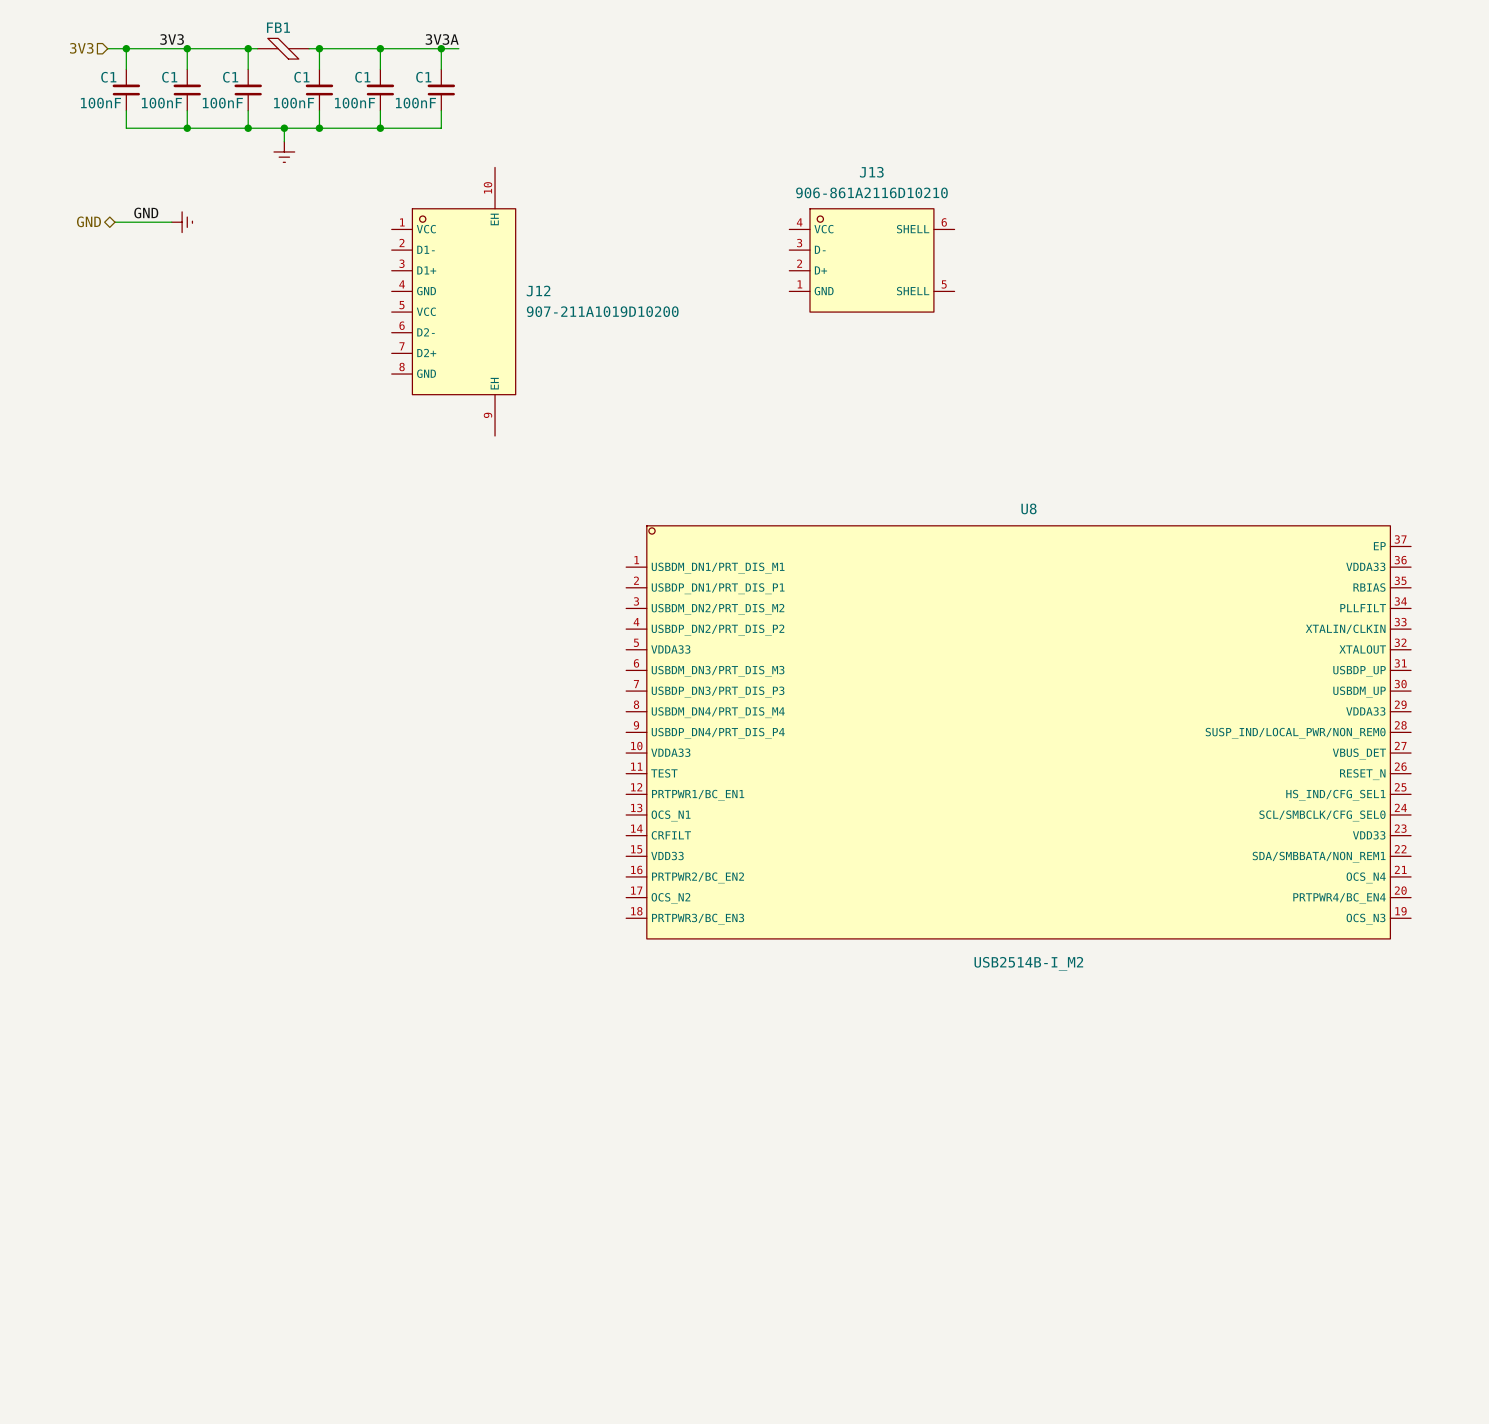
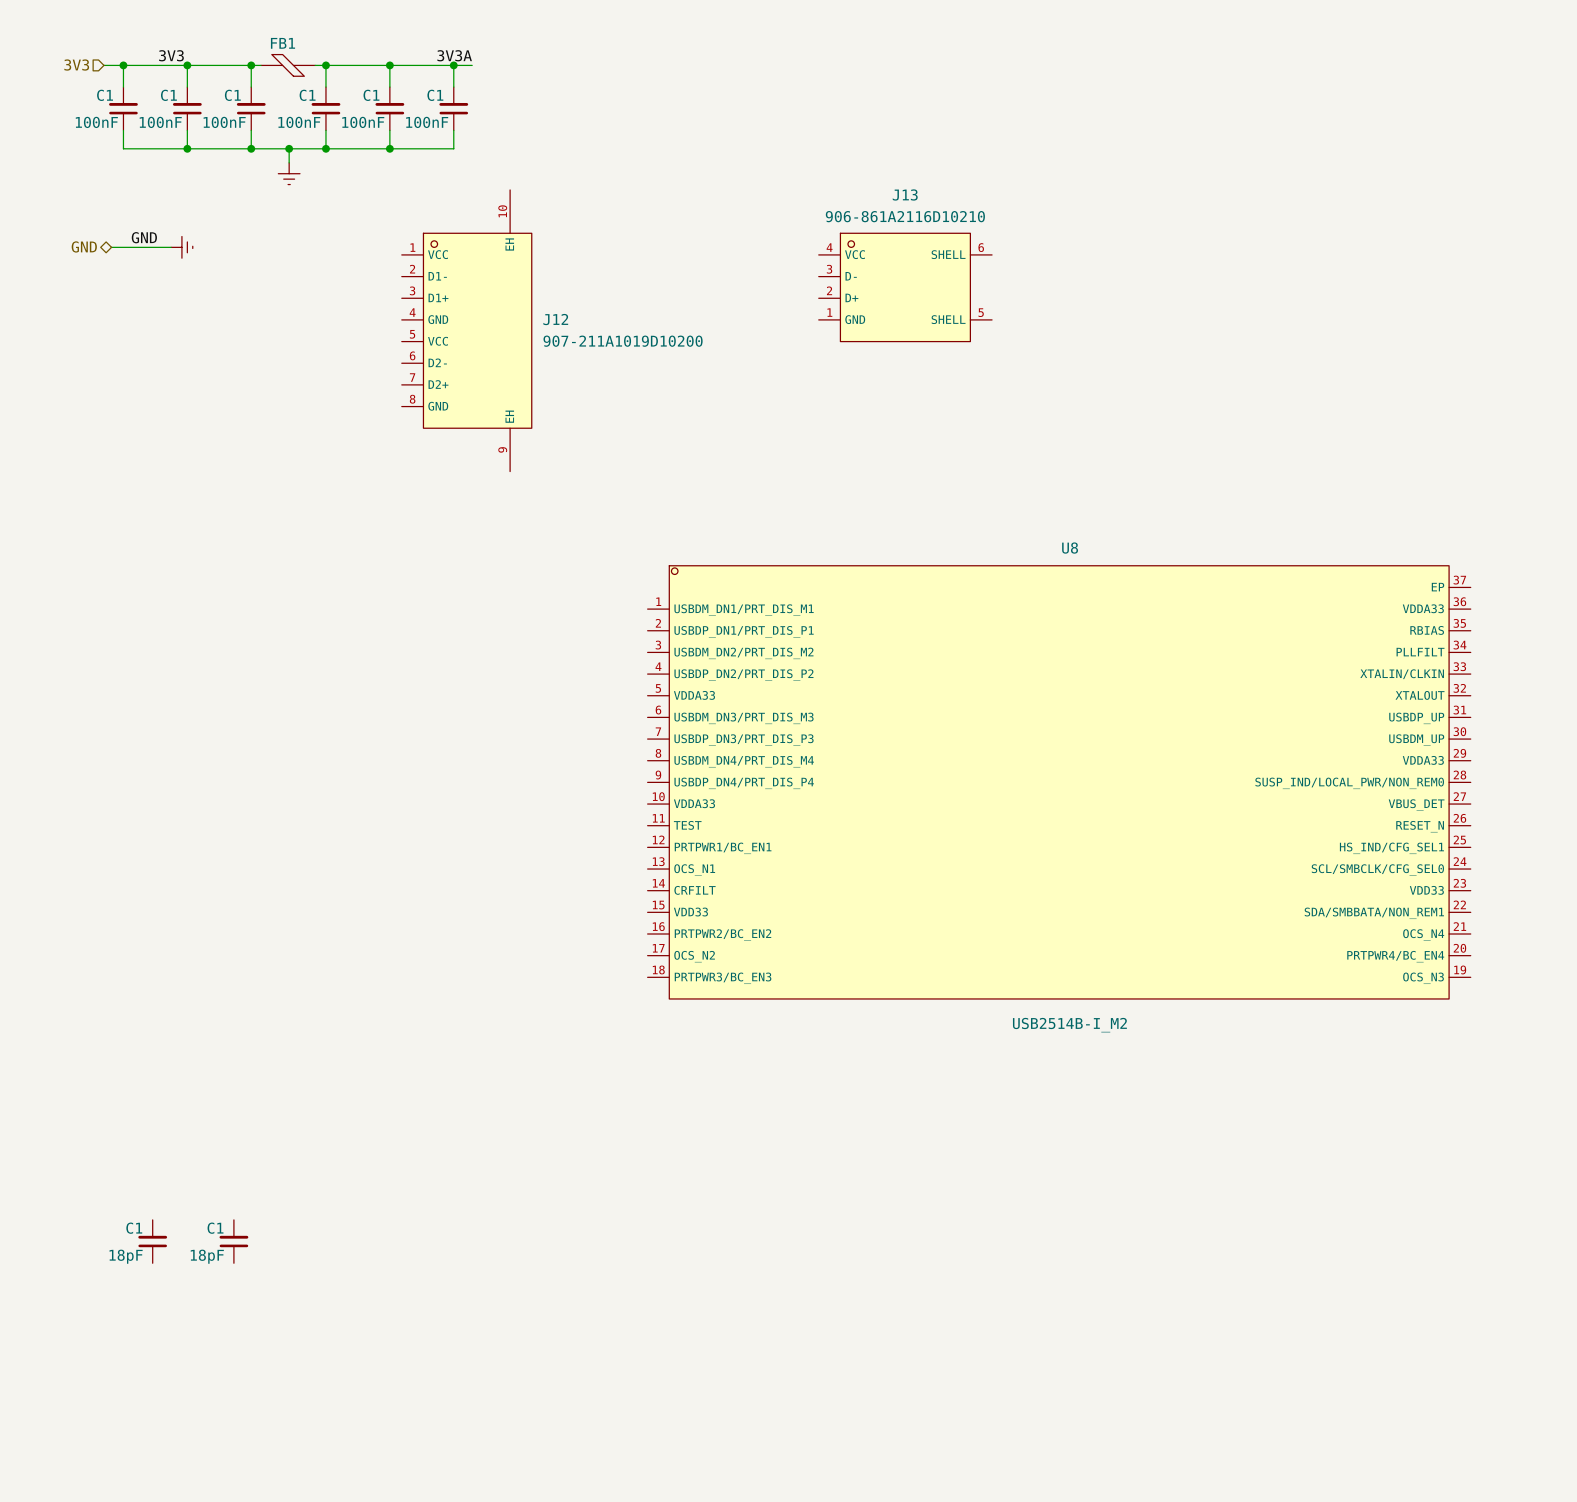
C1: none -> 18pF (152, 1241)
C1: none -> 18pF (233, 1241)

